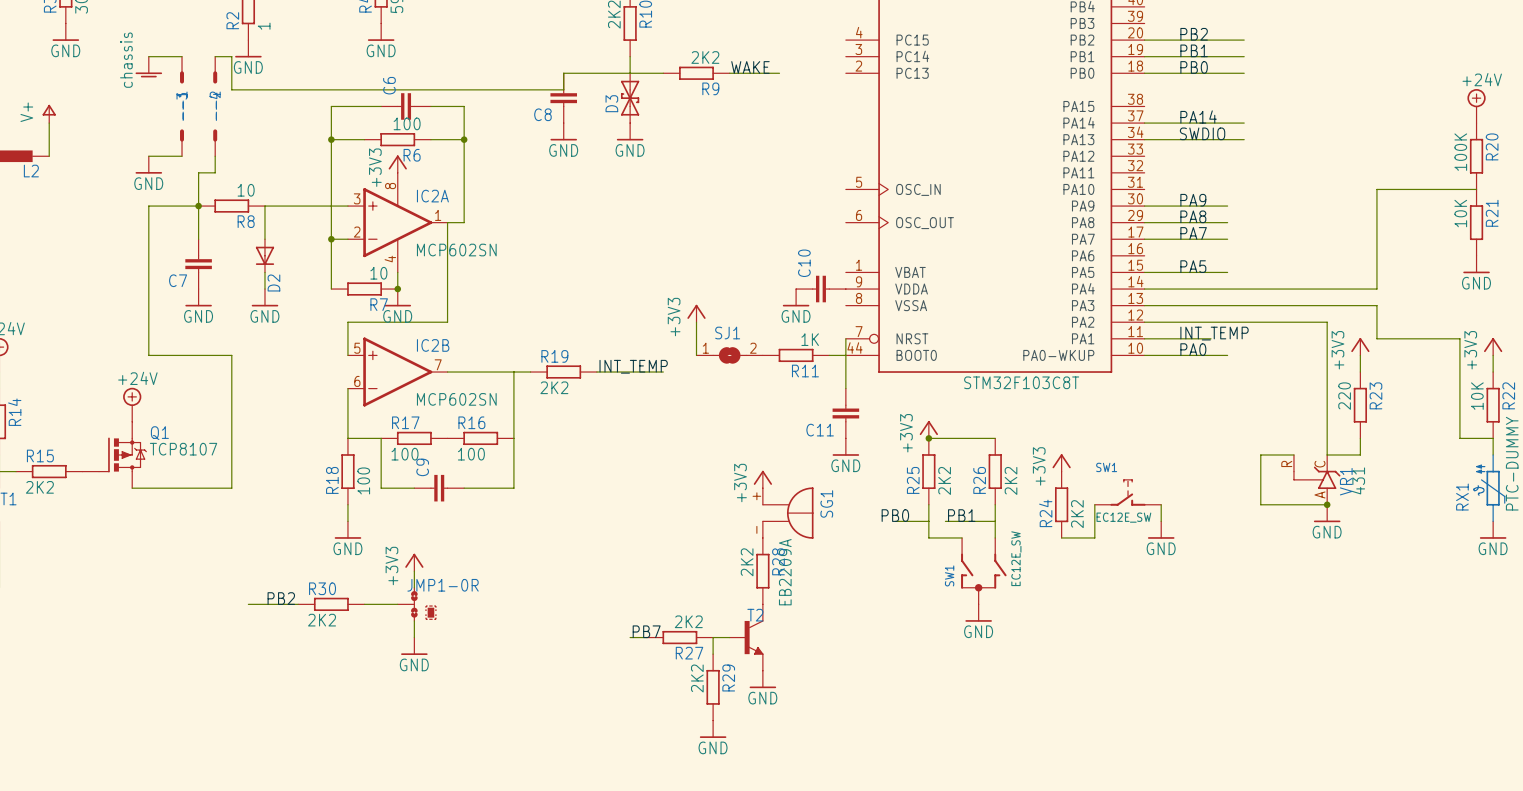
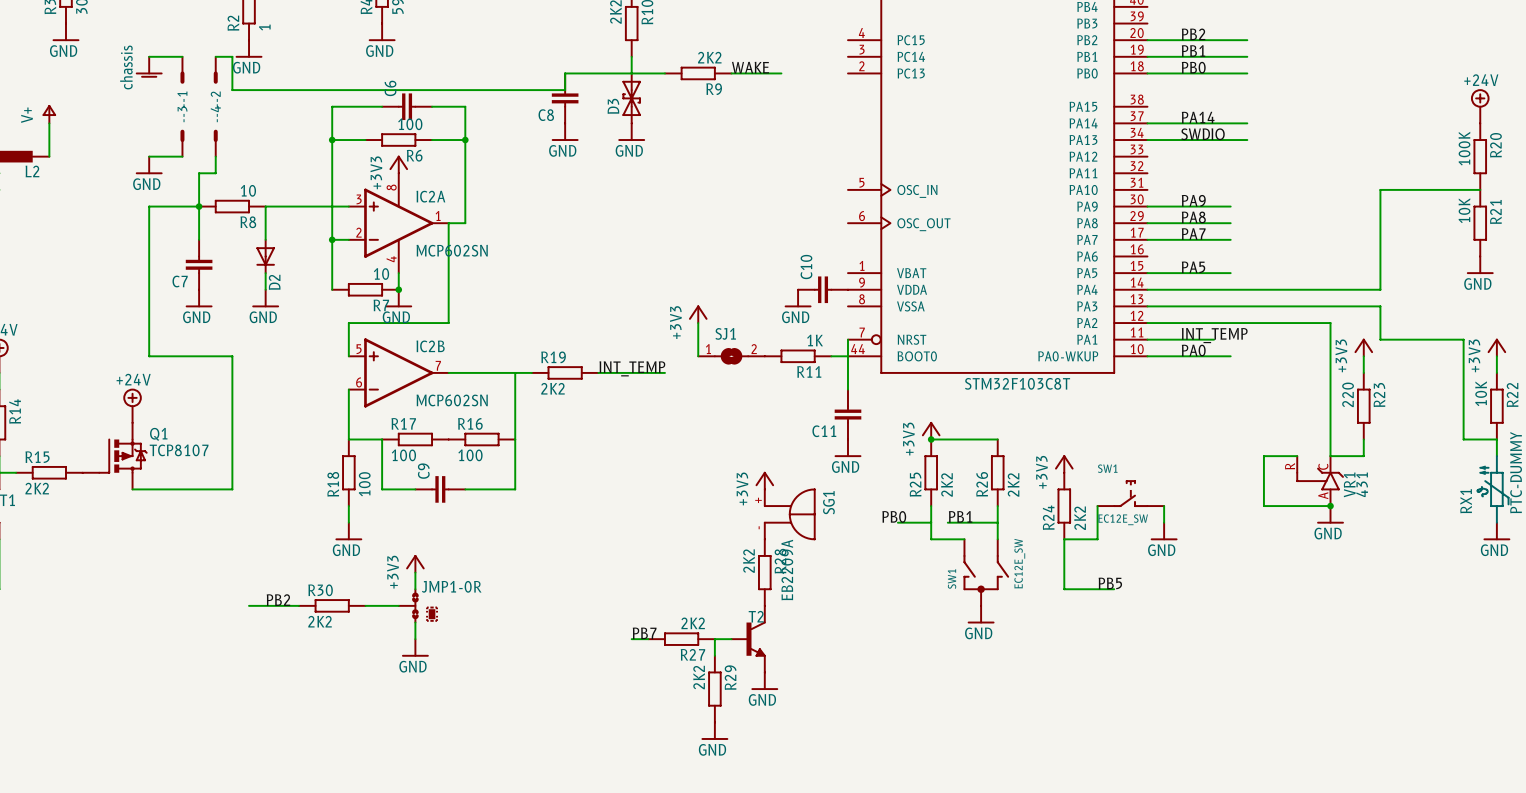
wire: none -> (1064, 539) (1064, 589) (1114, 589)
label: none -> PB5 (1110, 583)

